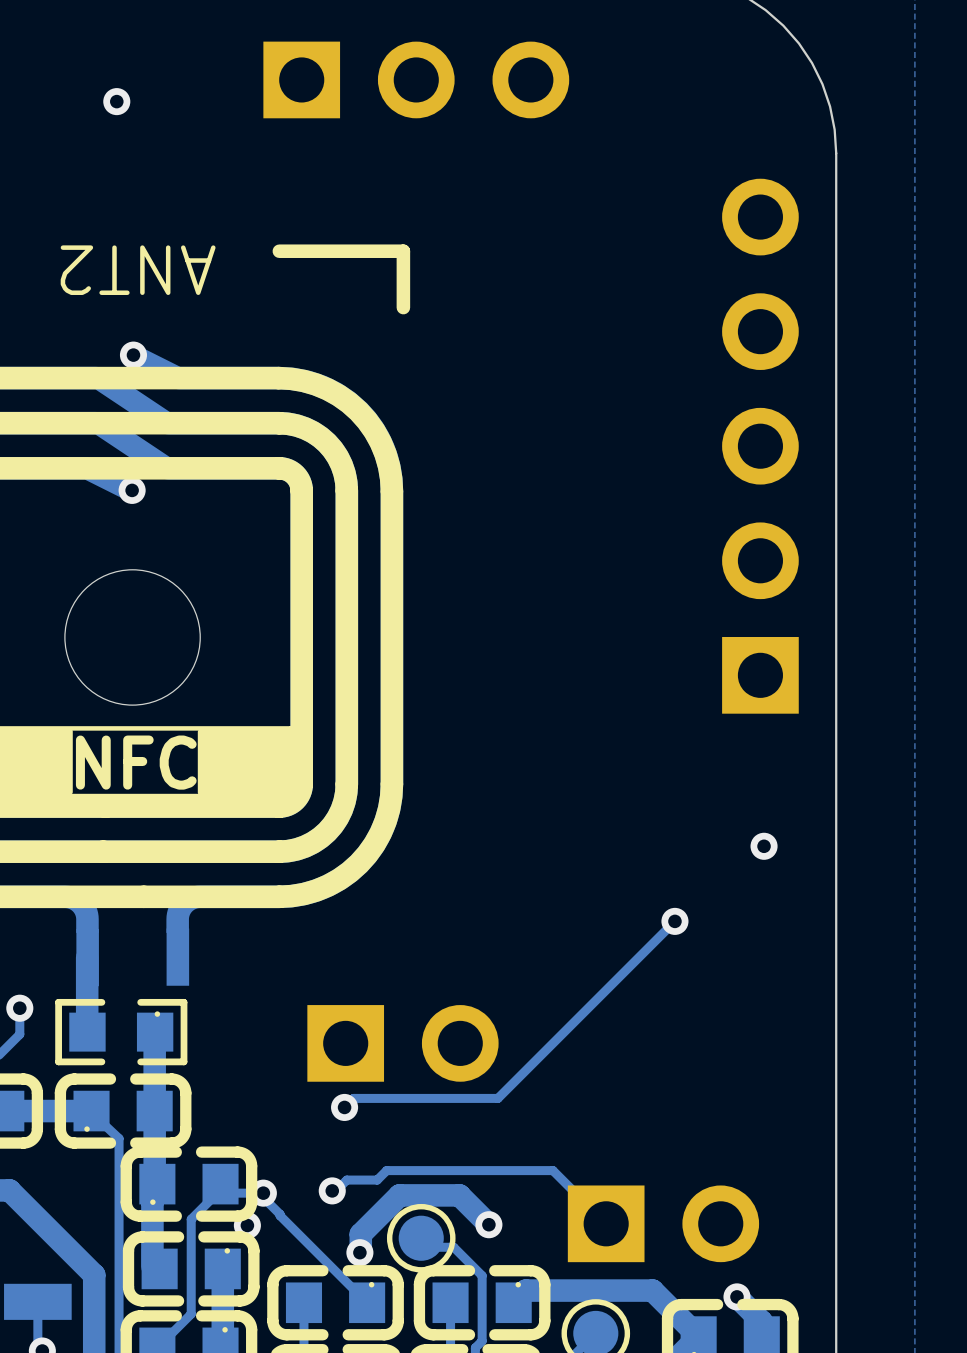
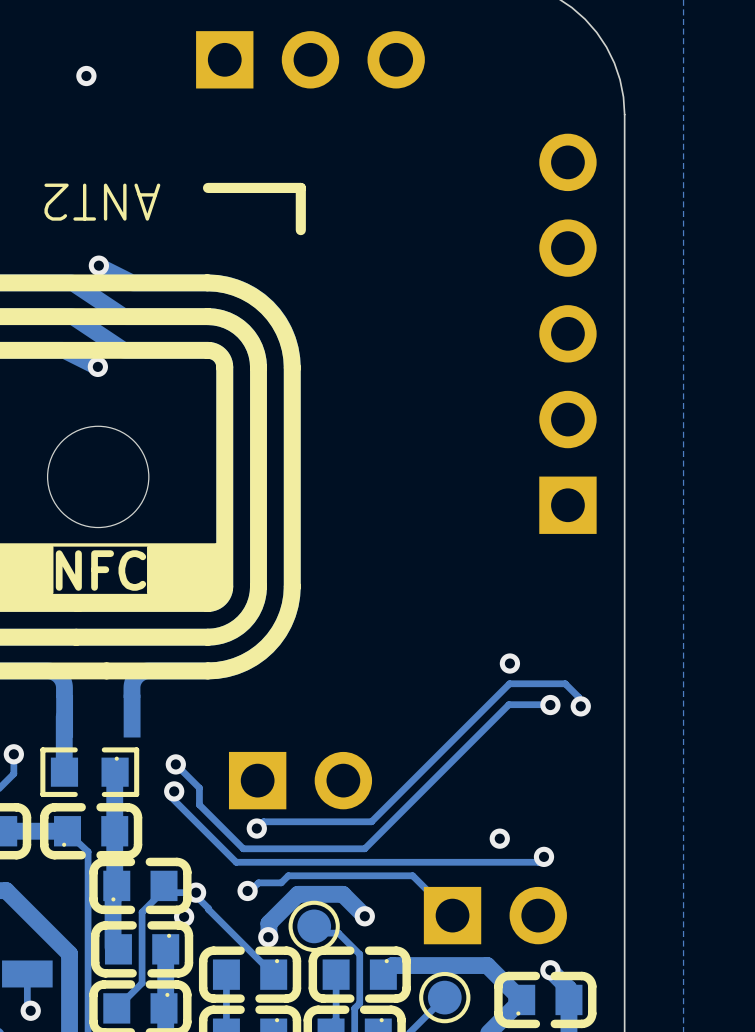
via: (764, 846) -> none
via: none -> (509, 663)
track: none -> (504, 689) (509, 683) (565, 683) (578, 697) (578, 704) (580, 706)
via: (674, 921) -> none
track: none -> (550, 704) (508, 704) (364, 848) (243, 848) (199, 804) (199, 788) (175, 764)
via: none -> (550, 705)
via: none -> (580, 706)
via: none -> (175, 764)
track: none -> (174, 791) (171, 797) (236, 862) (538, 862) (543, 856)
via: none -> (174, 791)
via: none -> (499, 838)
via: none -> (543, 856)

